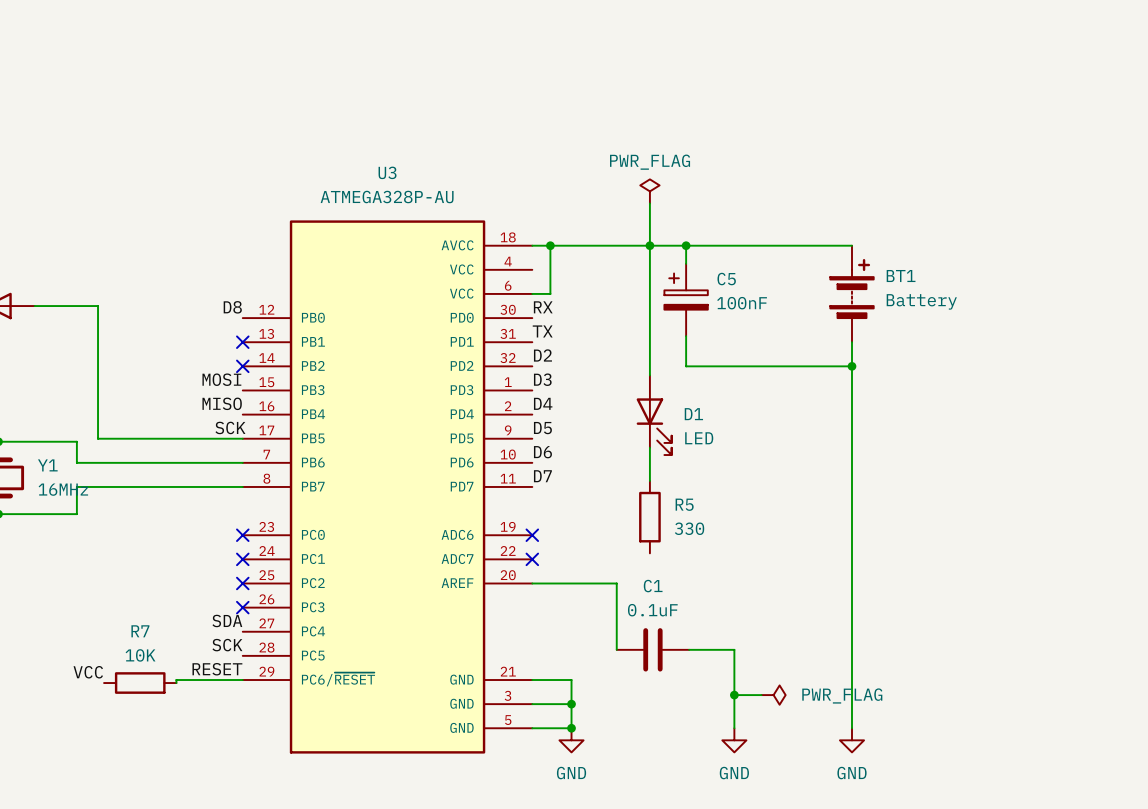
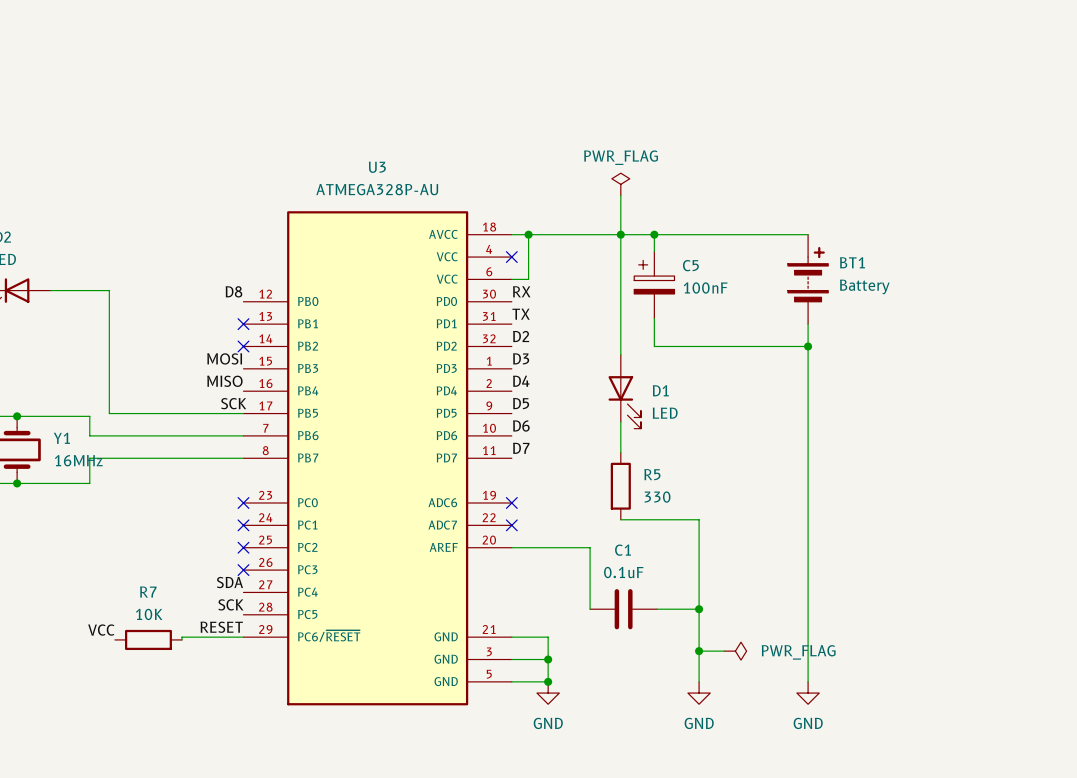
no-connect mark: none -> (511, 257)
wire: none -> (620, 519) (699, 519) (699, 609)
junction: none -> (699, 609)

